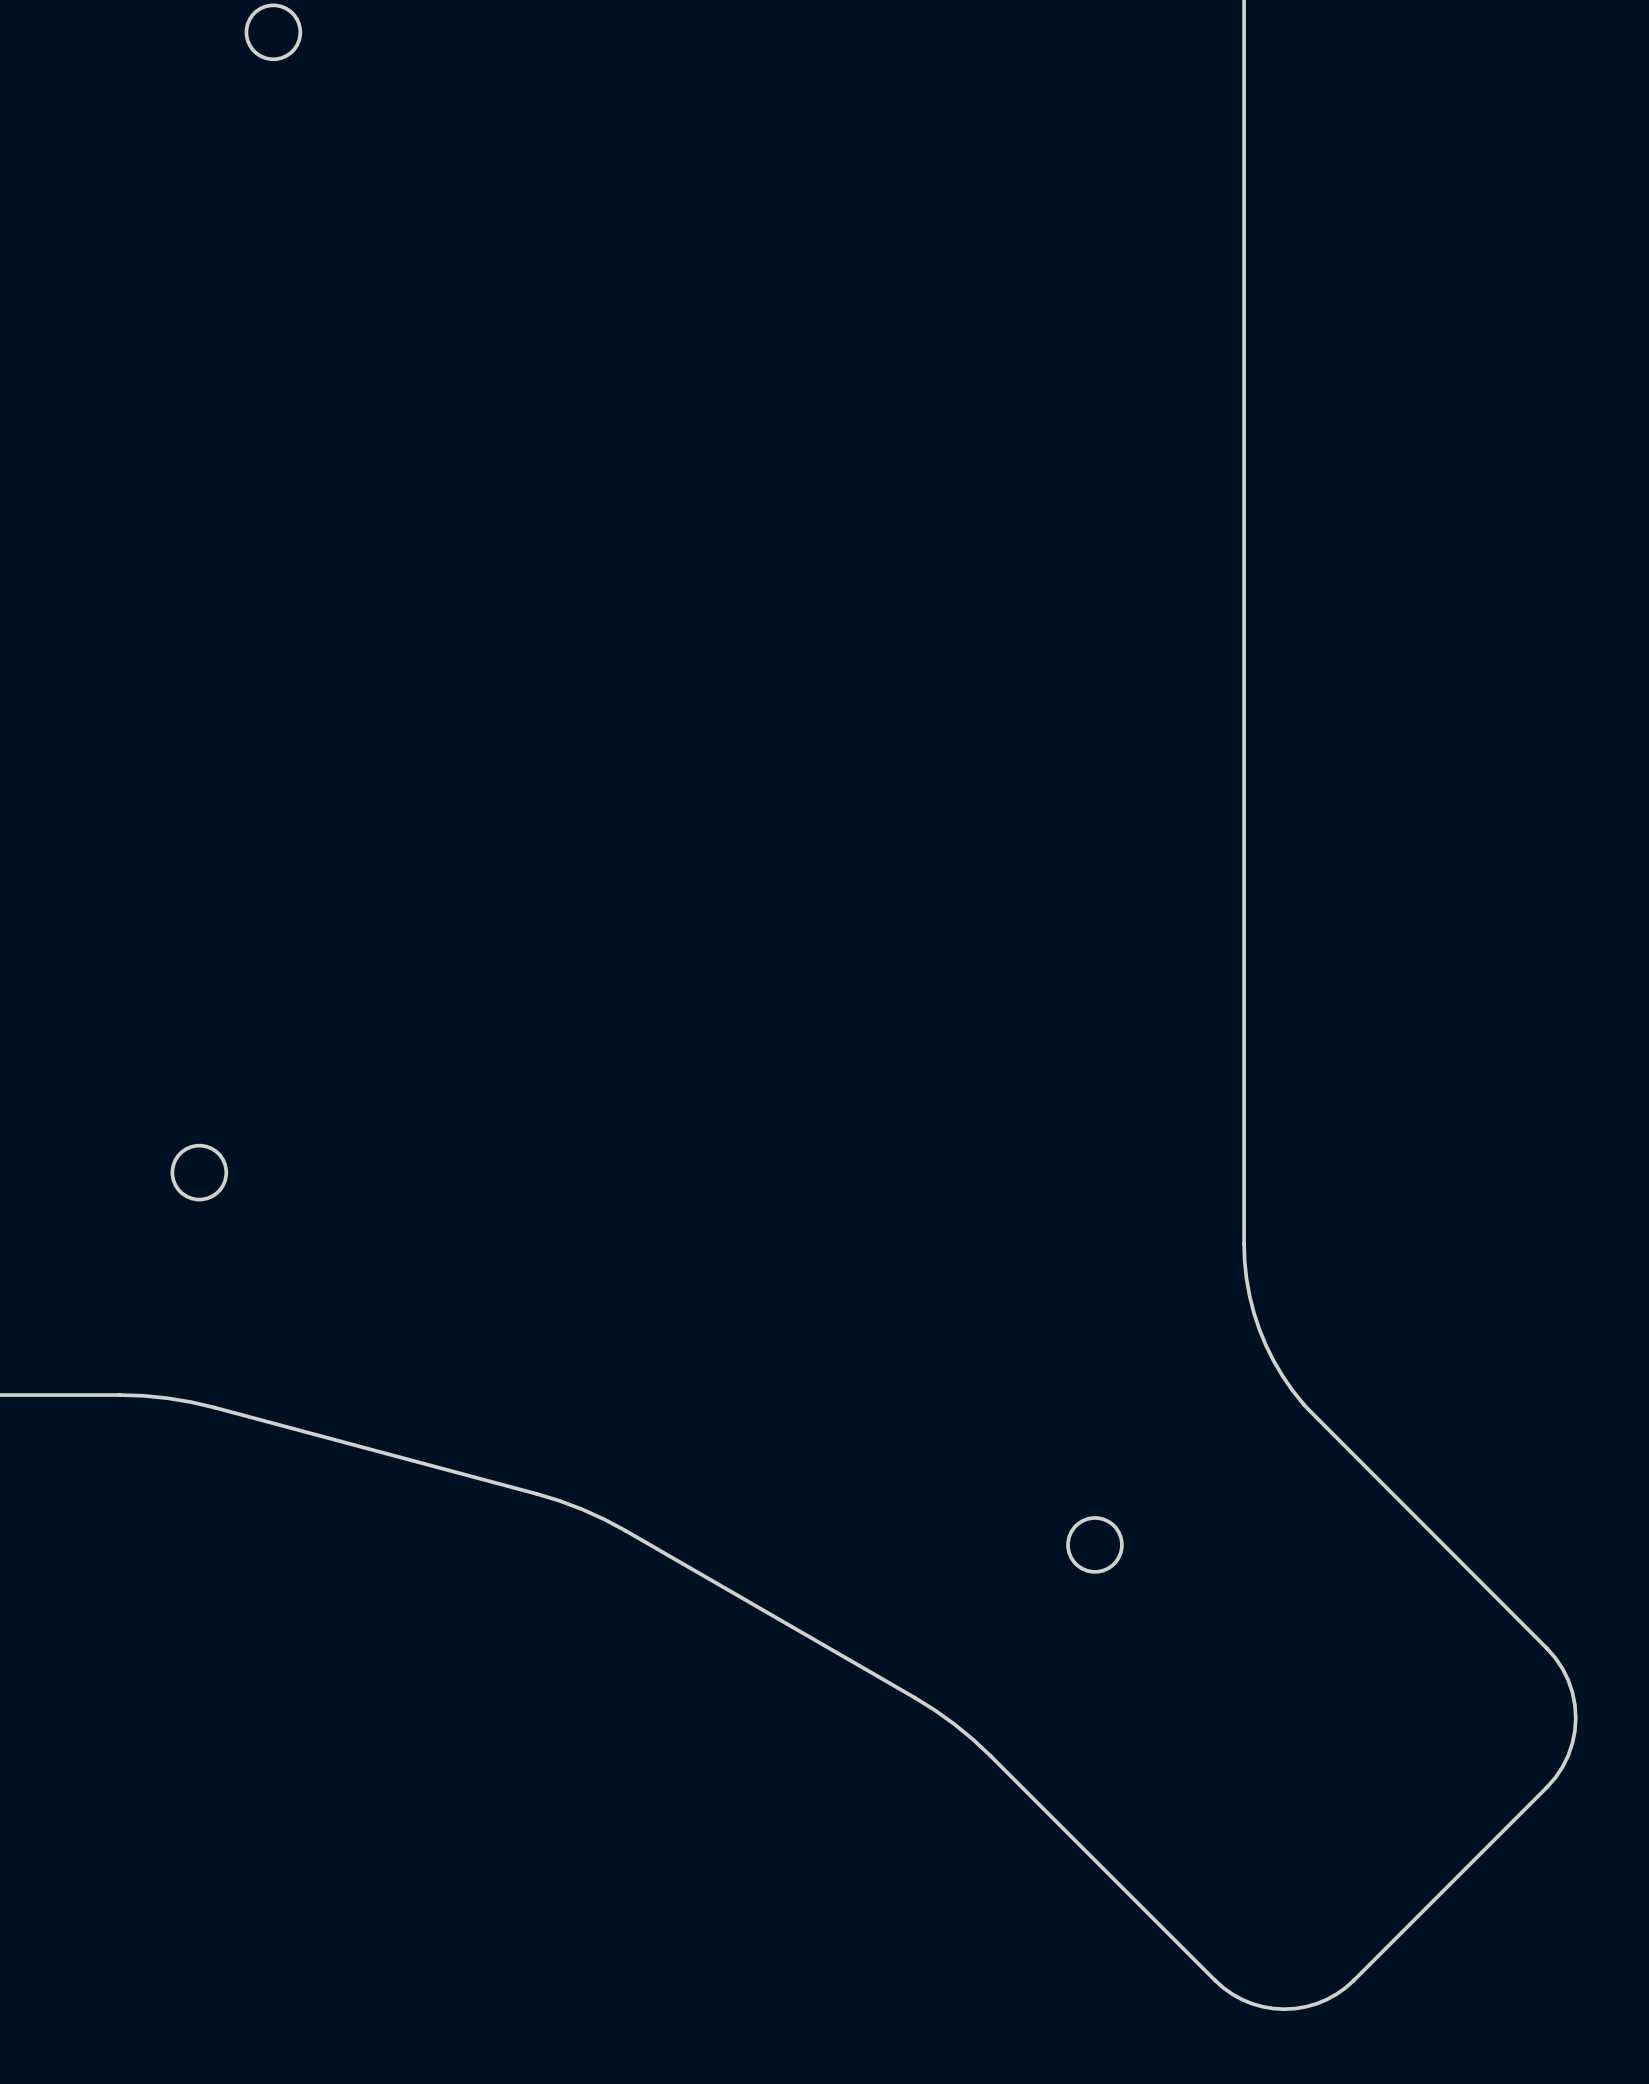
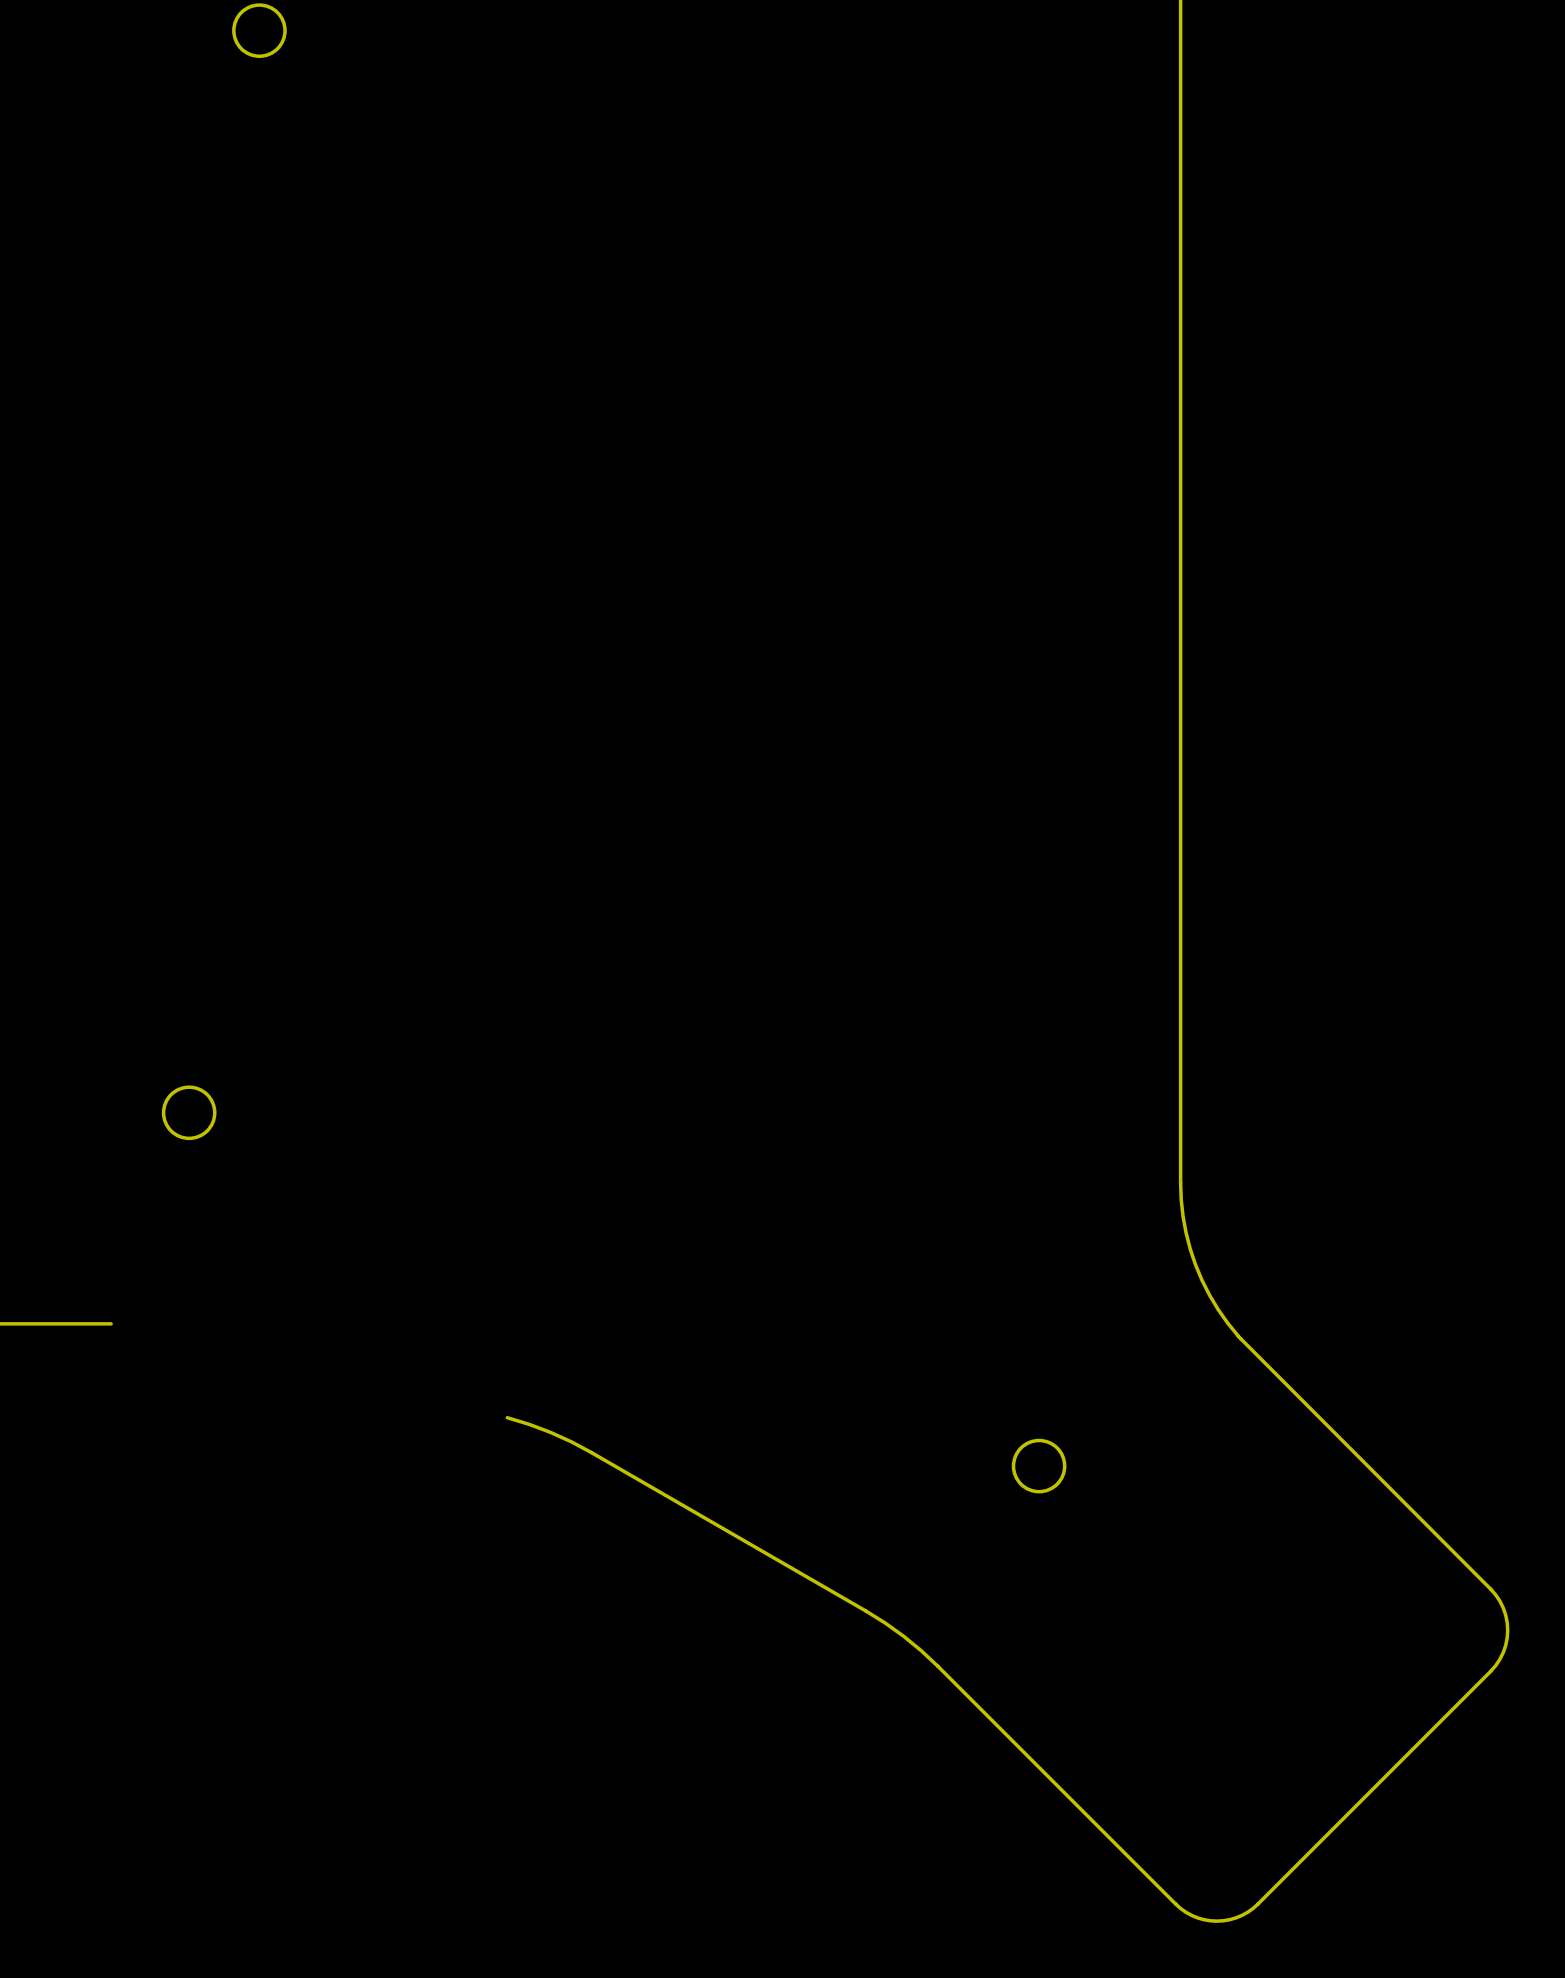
board edge: (1244, 1244) (1246, 1278) (1253, 1313) (1266, 1345) (1292, 1390) (1308, 1409) (1547, 1648) (1562, 1668) (1568, 1680) (1574, 1705) (1574, 1730) (1572, 1743) (1562, 1766) (1547, 1787) (1345, 1987) (1316, 2003) (1295, 2008) (1262, 2006) (1241, 1999) (1223, 1987) (990, 1755) (954, 1724) (934, 1710) (604, 1519) (582, 1509) (536, 1493) (214, 1407) (167, 1398) (117, 1395) -> (1180, 1180) (1183, 1216) (1190, 1248) (1209, 1295) (1227, 1323) (1240, 1338) (1490, 1589) (1503, 1608) (1507, 1622) (1505, 1645) (1499, 1659) (1490, 1671) (1257, 1904) (1236, 1917) (1223, 1920) (1203, 1919) (1180, 1908) (937, 1666) (885, 1622) (591, 1452) (550, 1432) (507, 1417)

